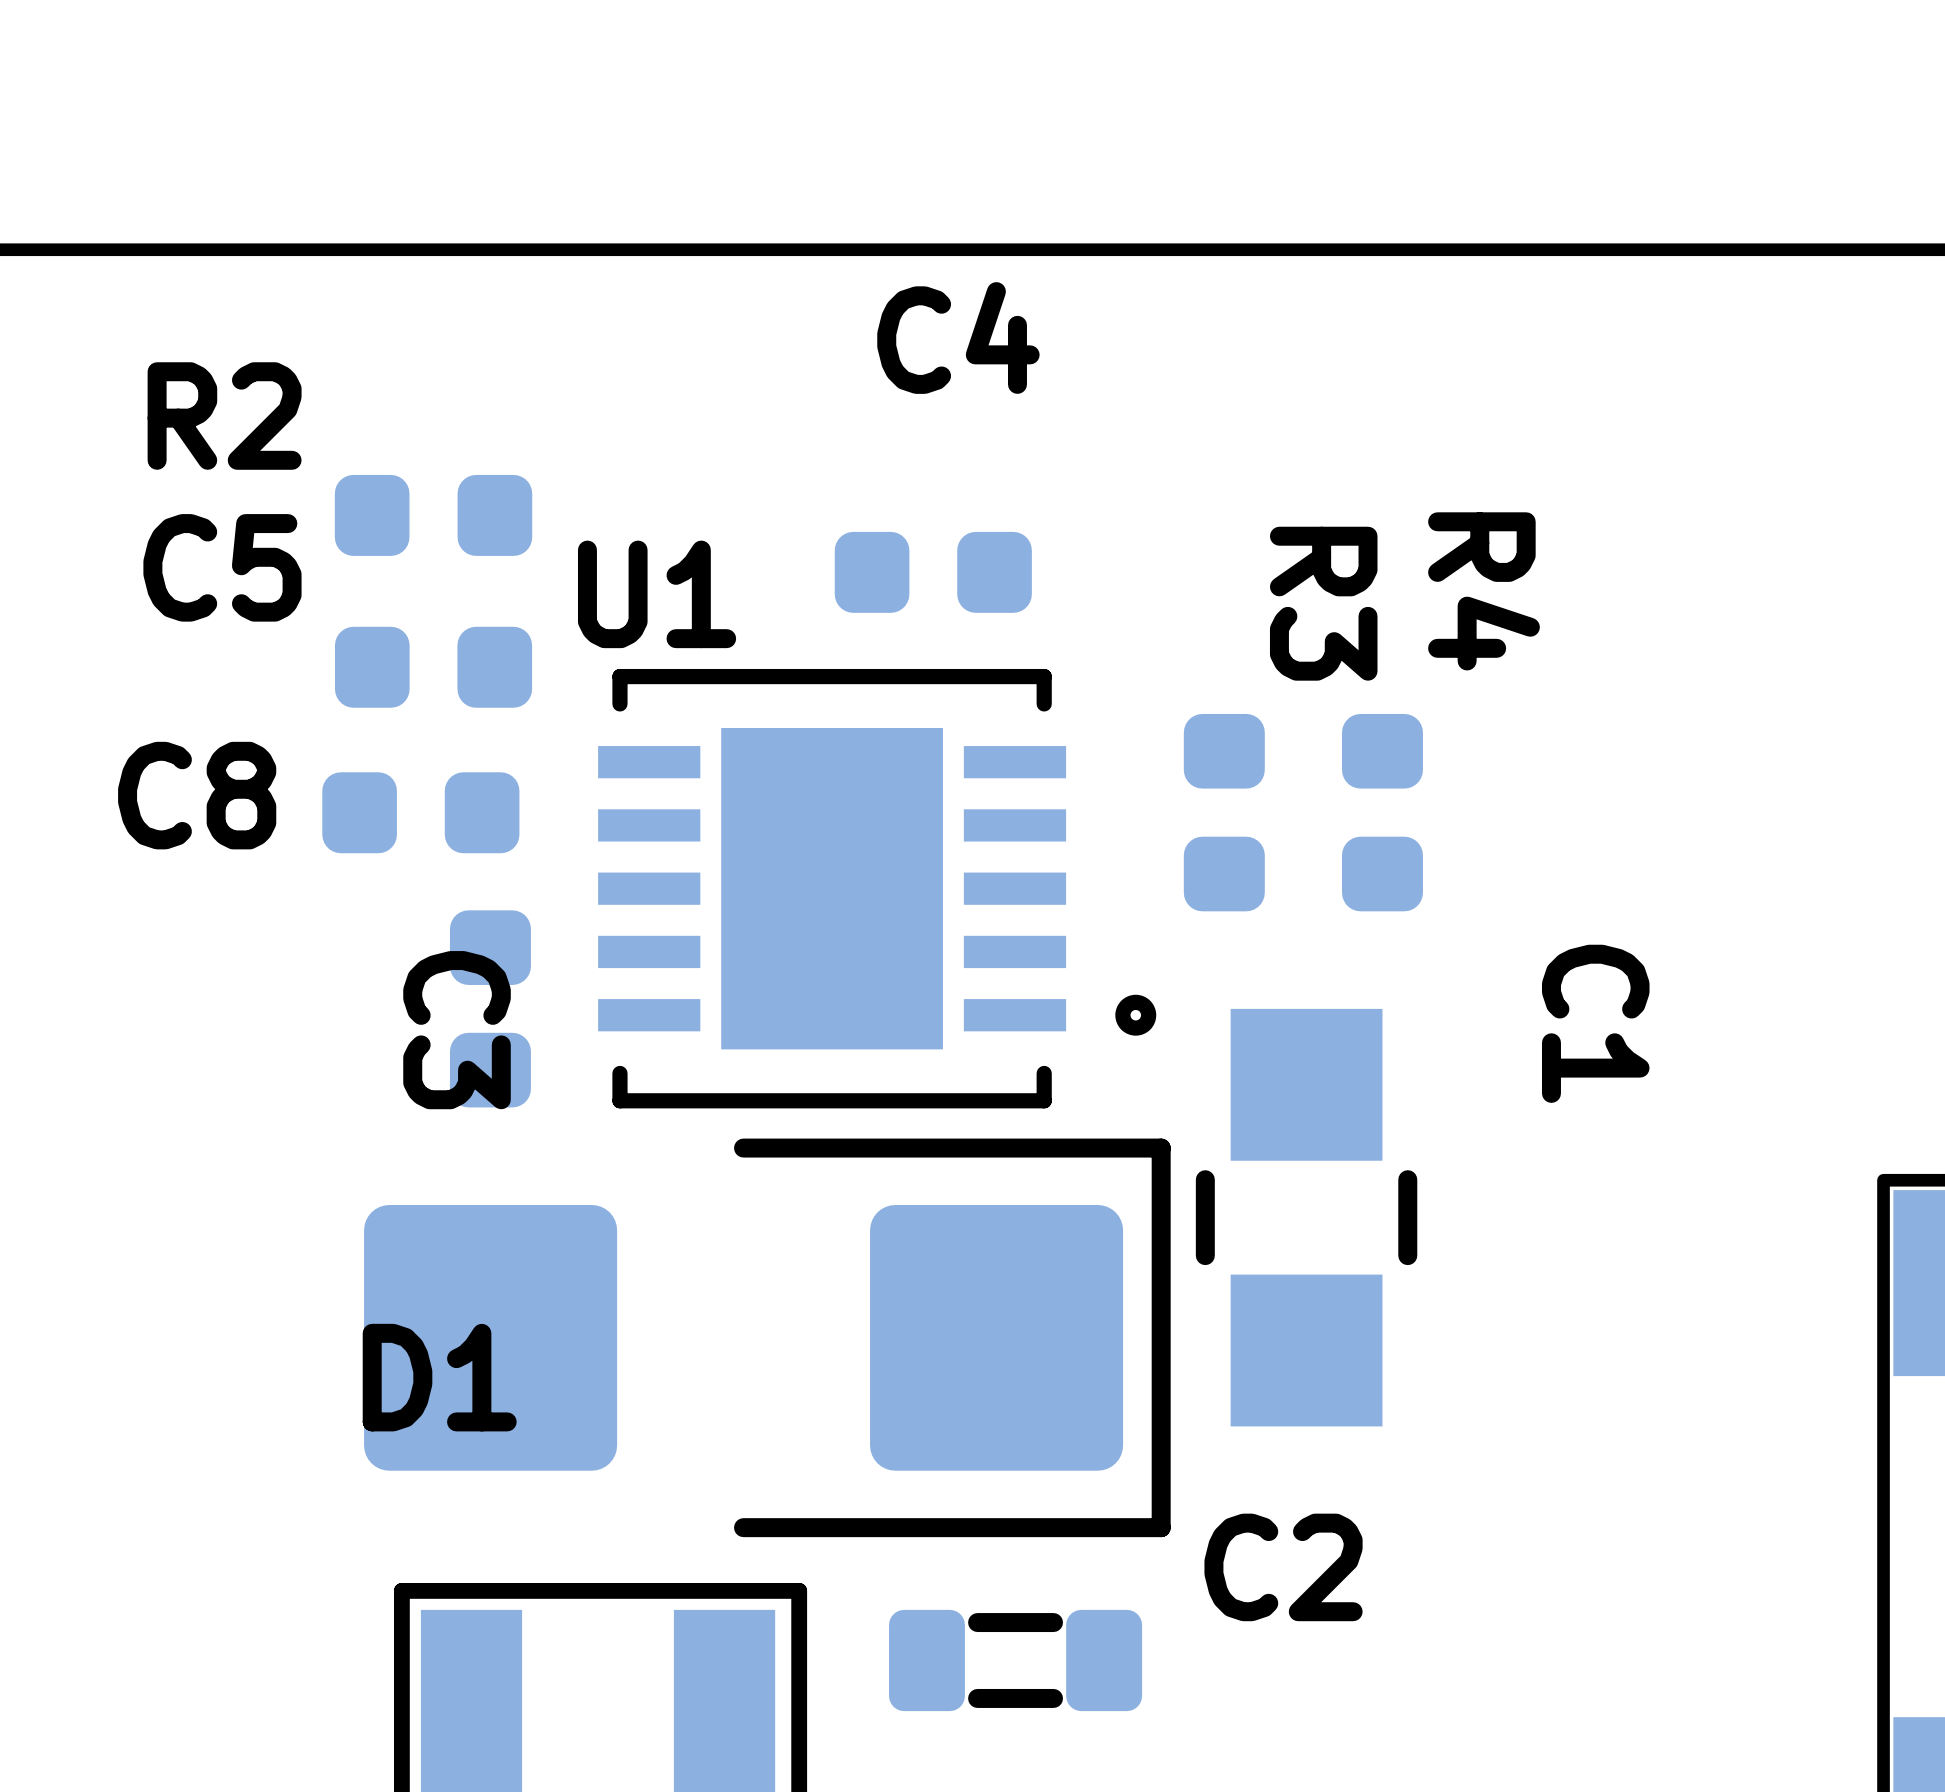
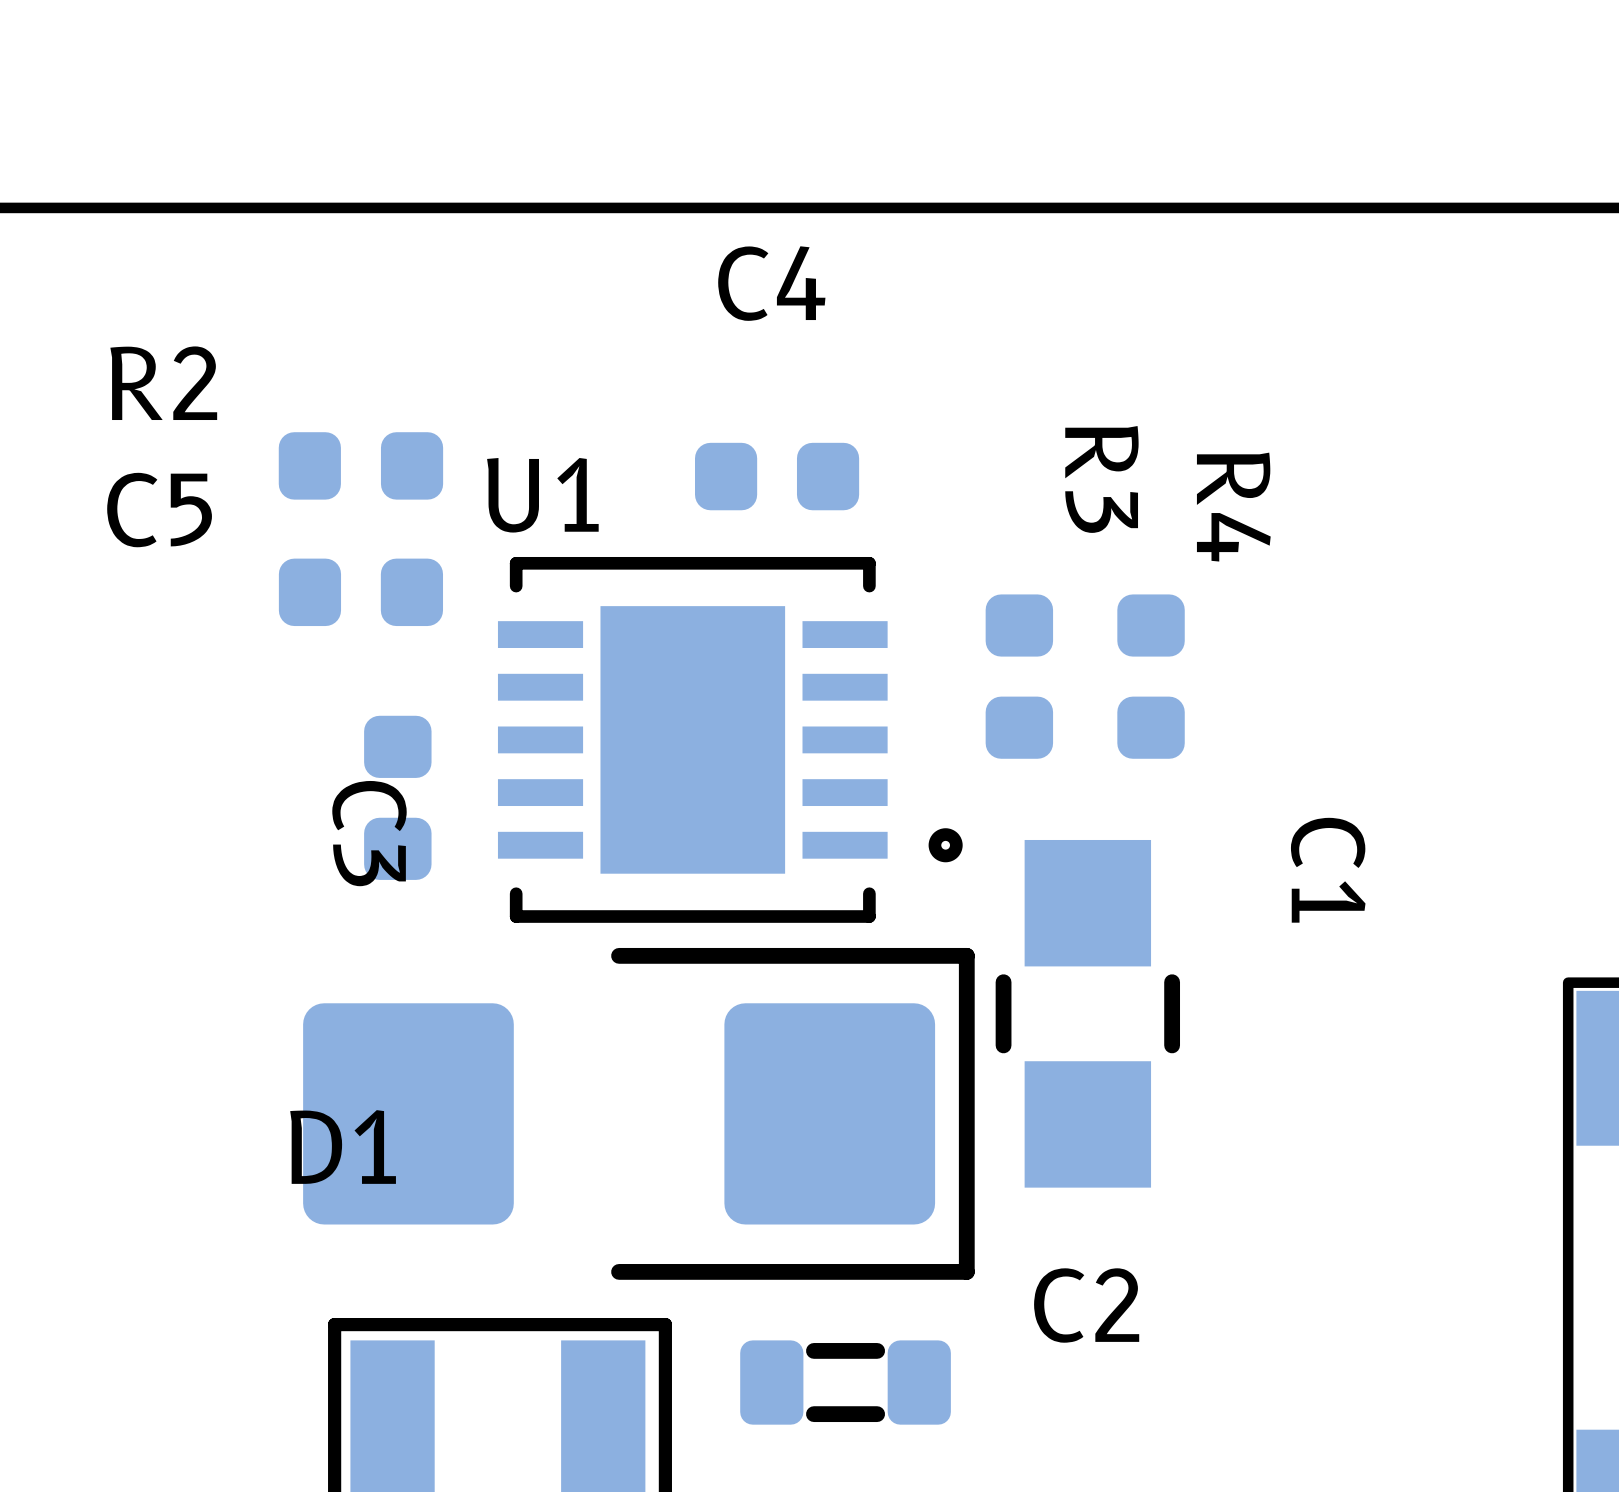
R2 position: (433, 515) -> (360, 465)
C5 position: (433, 667) -> (360, 592)
C8: (420, 812) -> none
C3 position: (490, 1008) -> (397, 797)

